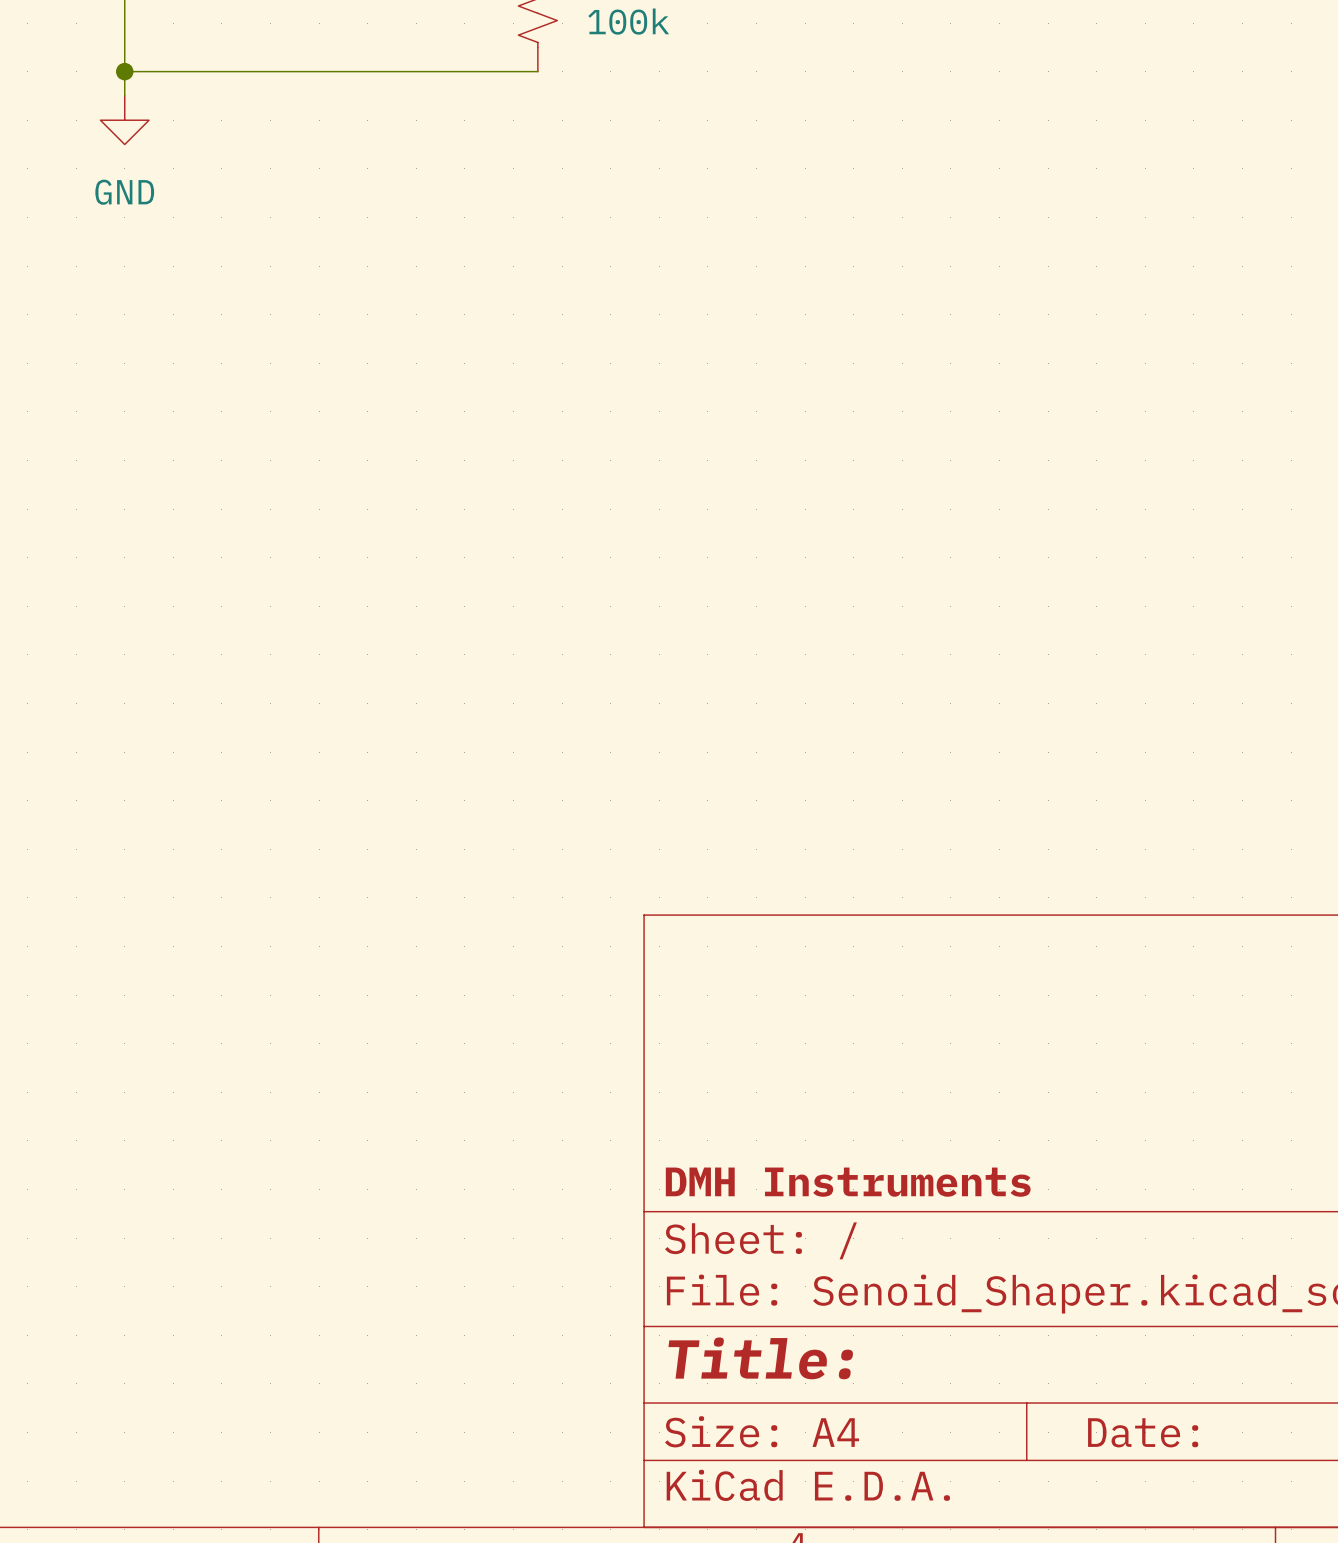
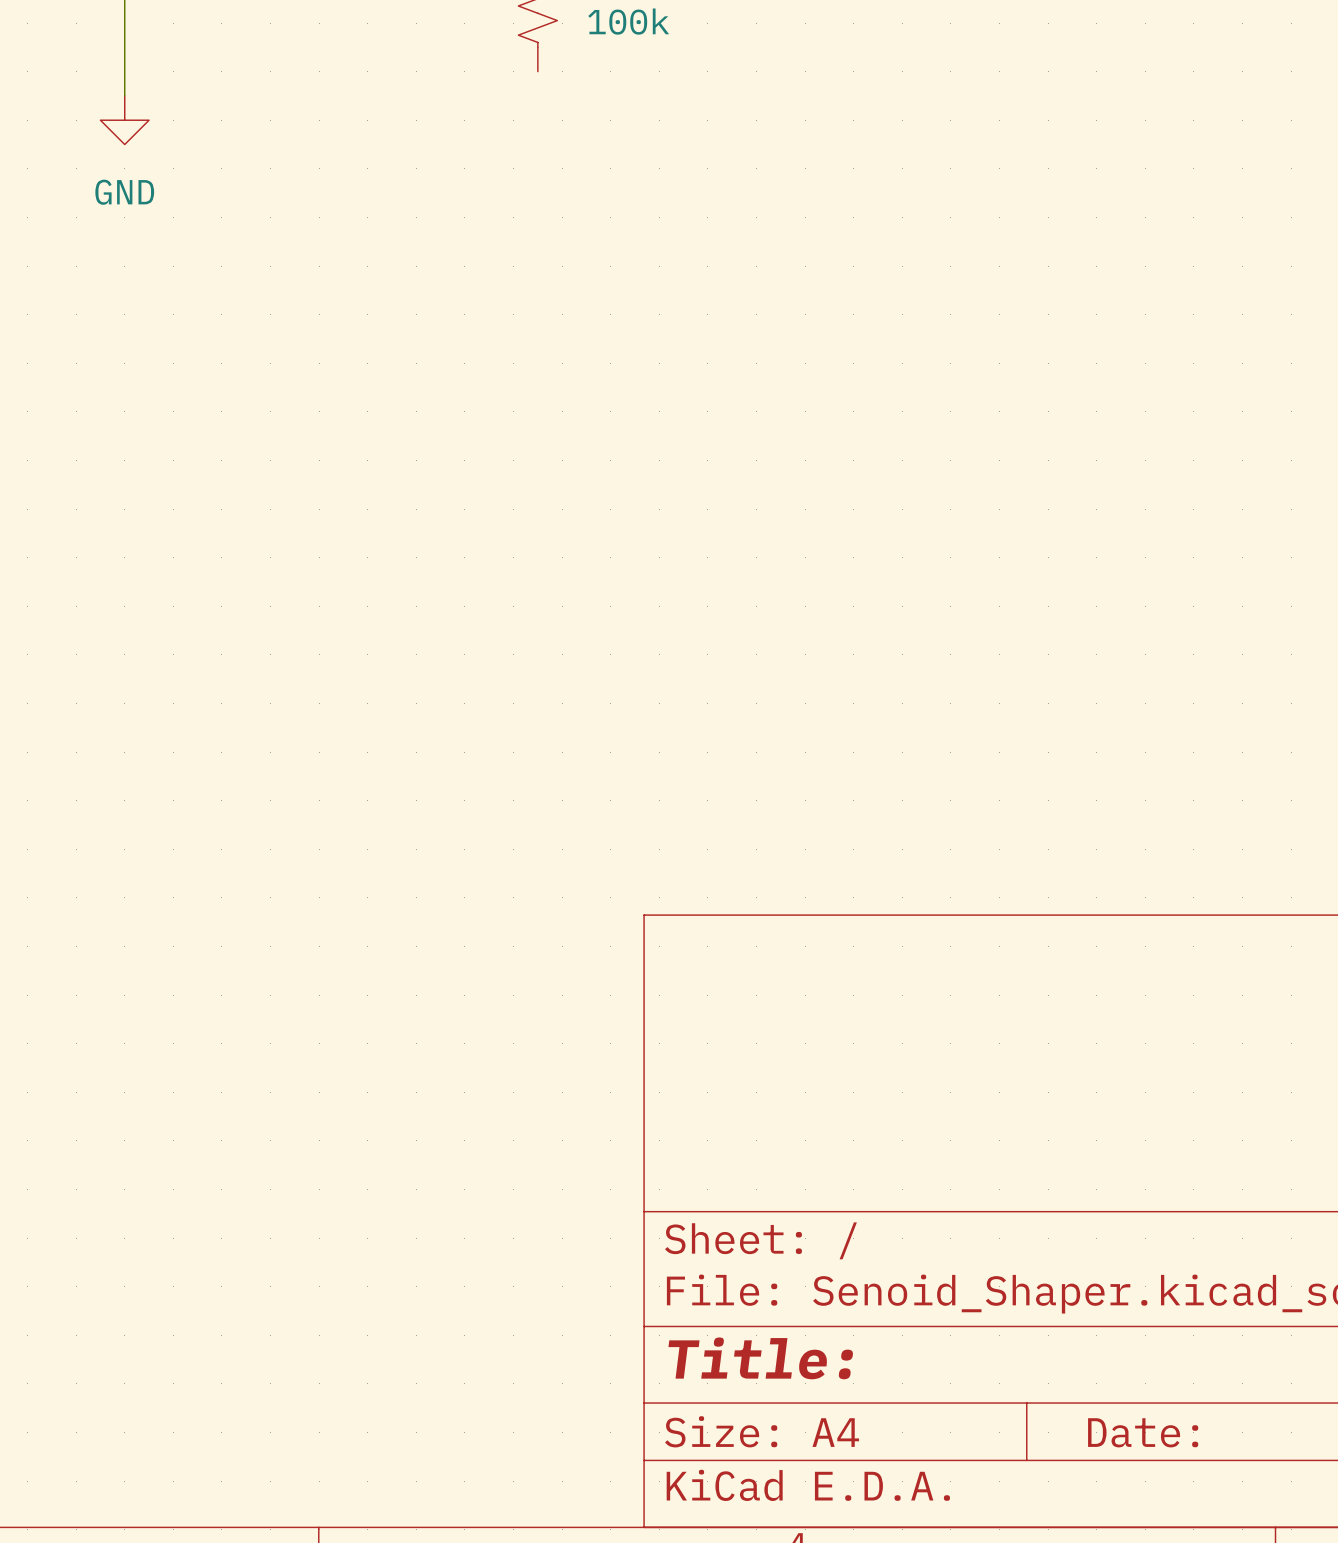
wire: (124, 71) (537, 71) -> none
junction: (124, 71) -> none
title block: DMH Instruments (848, 1182) -> none

